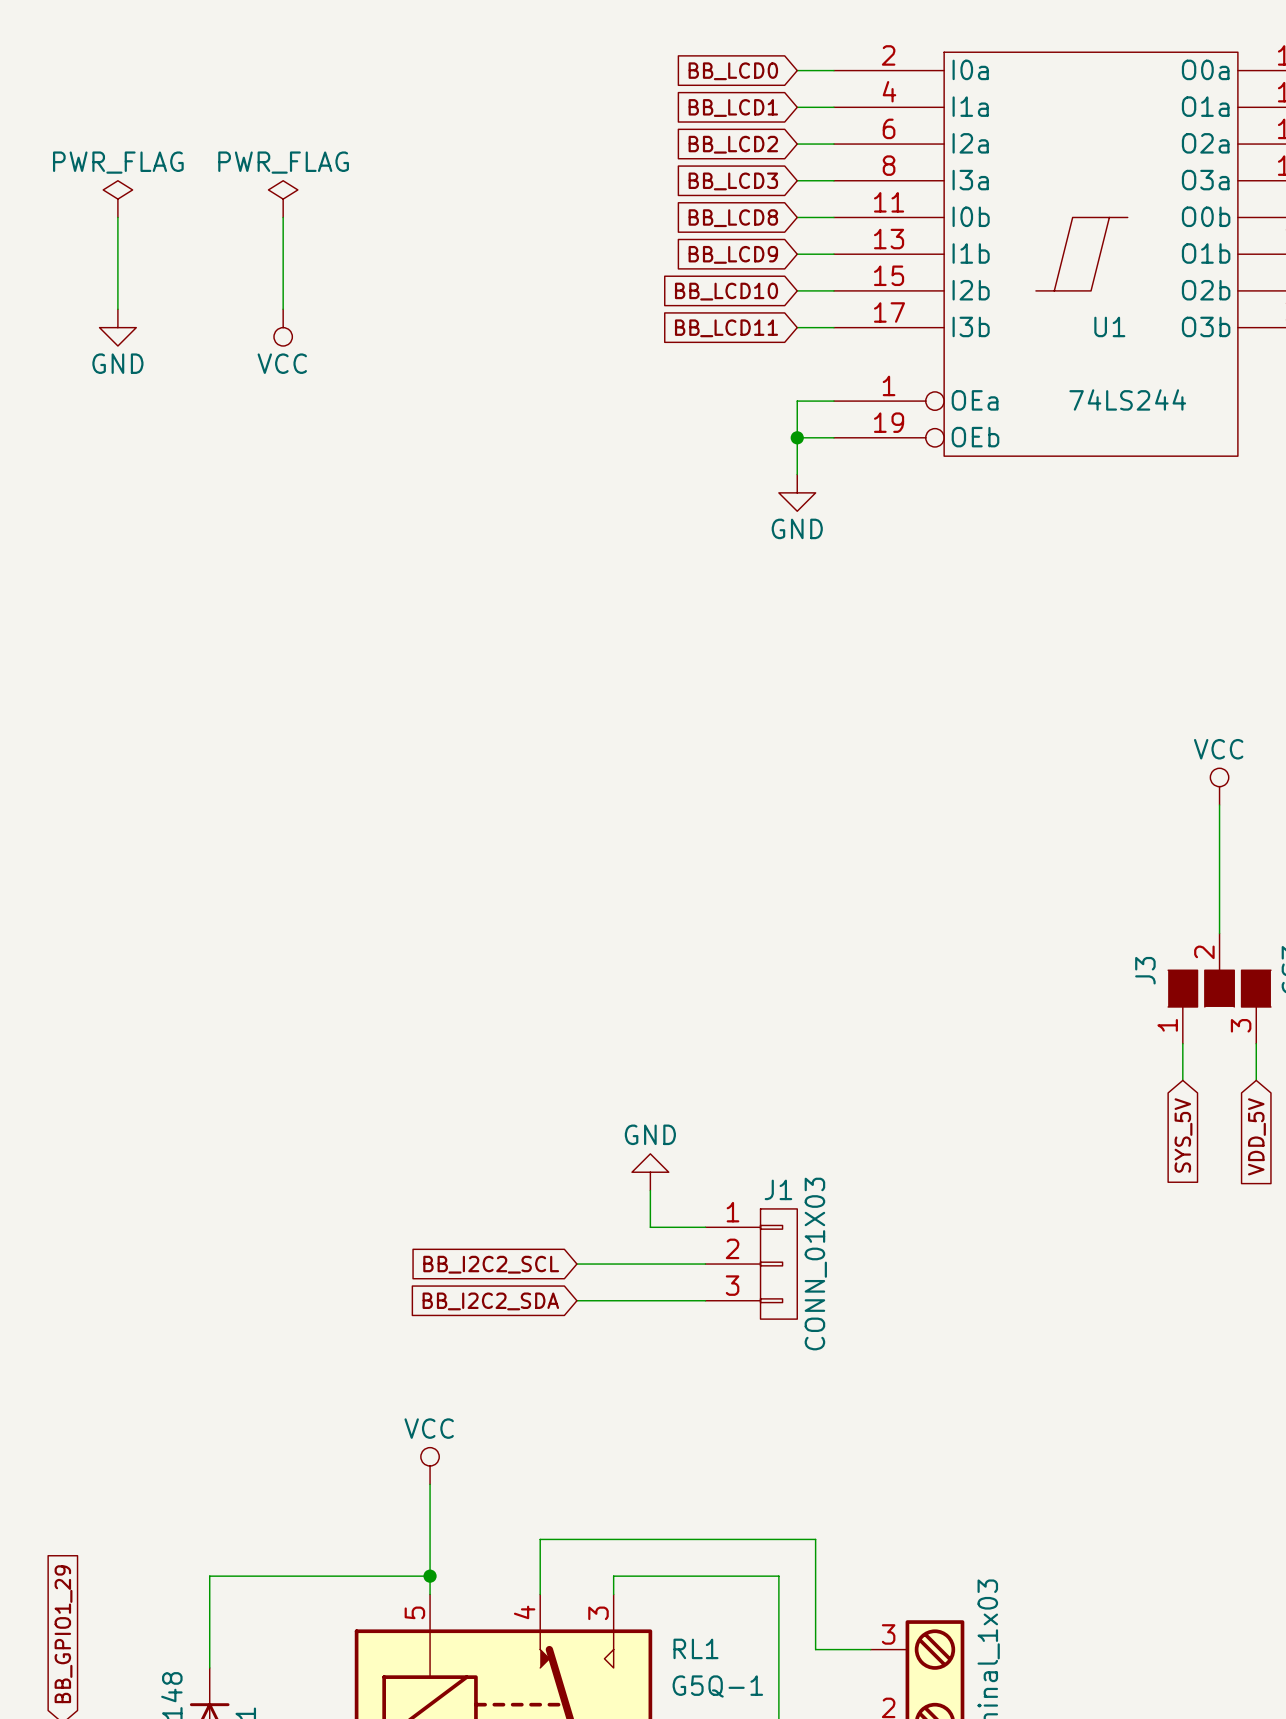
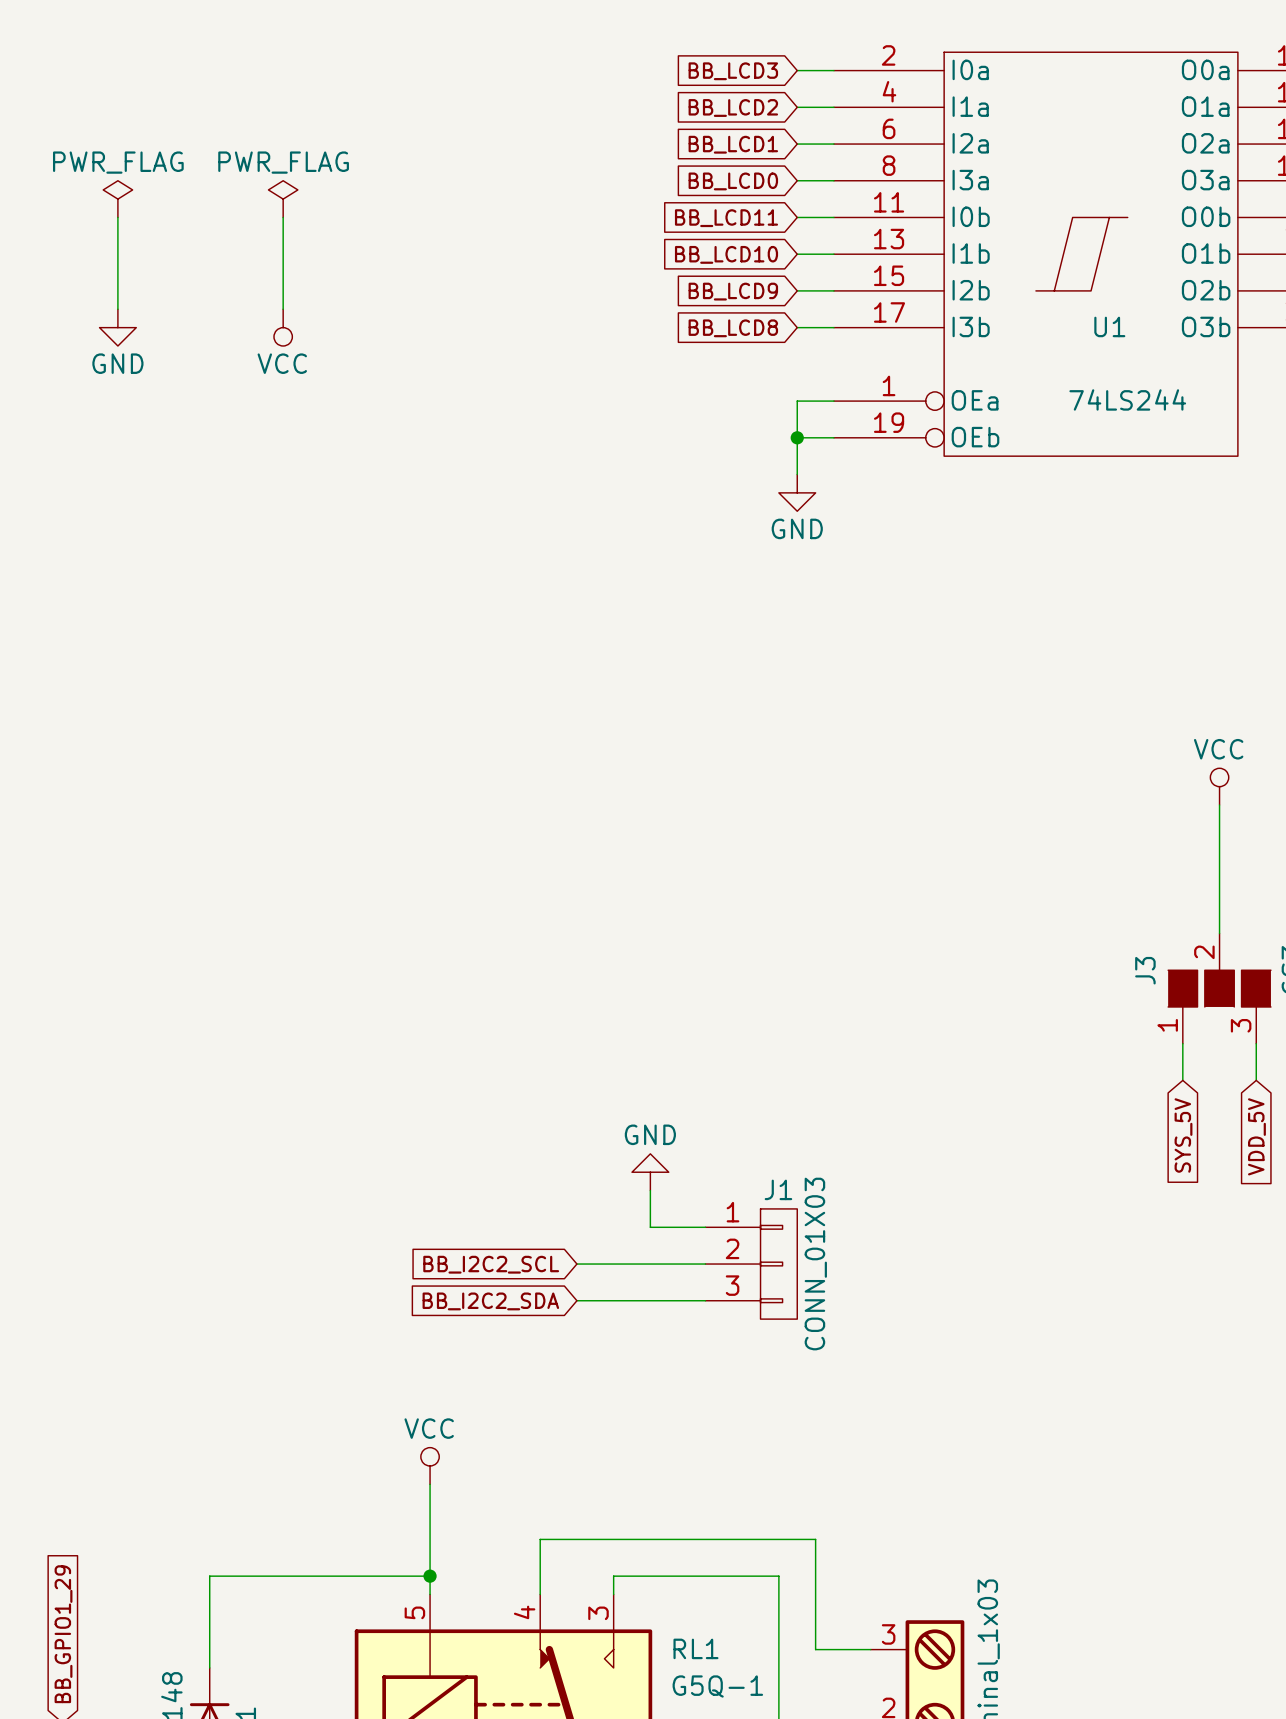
global label: BB_LCD0 (733, 71) -> BB_LCD3 (733, 71)
global label: BB_LCD1 (733, 107) -> BB_LCD2 (733, 107)
global label: BB_LCD2 (733, 144) -> BB_LCD1 (733, 144)
global label: BB_LCD3 (733, 181) -> BB_LCD0 (733, 181)
global label: BB_LCD8 (733, 218) -> BB_LCD11 (726, 218)
global label: BB_LCD9 (733, 254) -> BB_LCD10 (726, 254)
global label: BB_LCD10 (726, 291) -> BB_LCD9 (733, 291)
global label: BB_LCD11 (726, 328) -> BB_LCD8 (733, 328)

